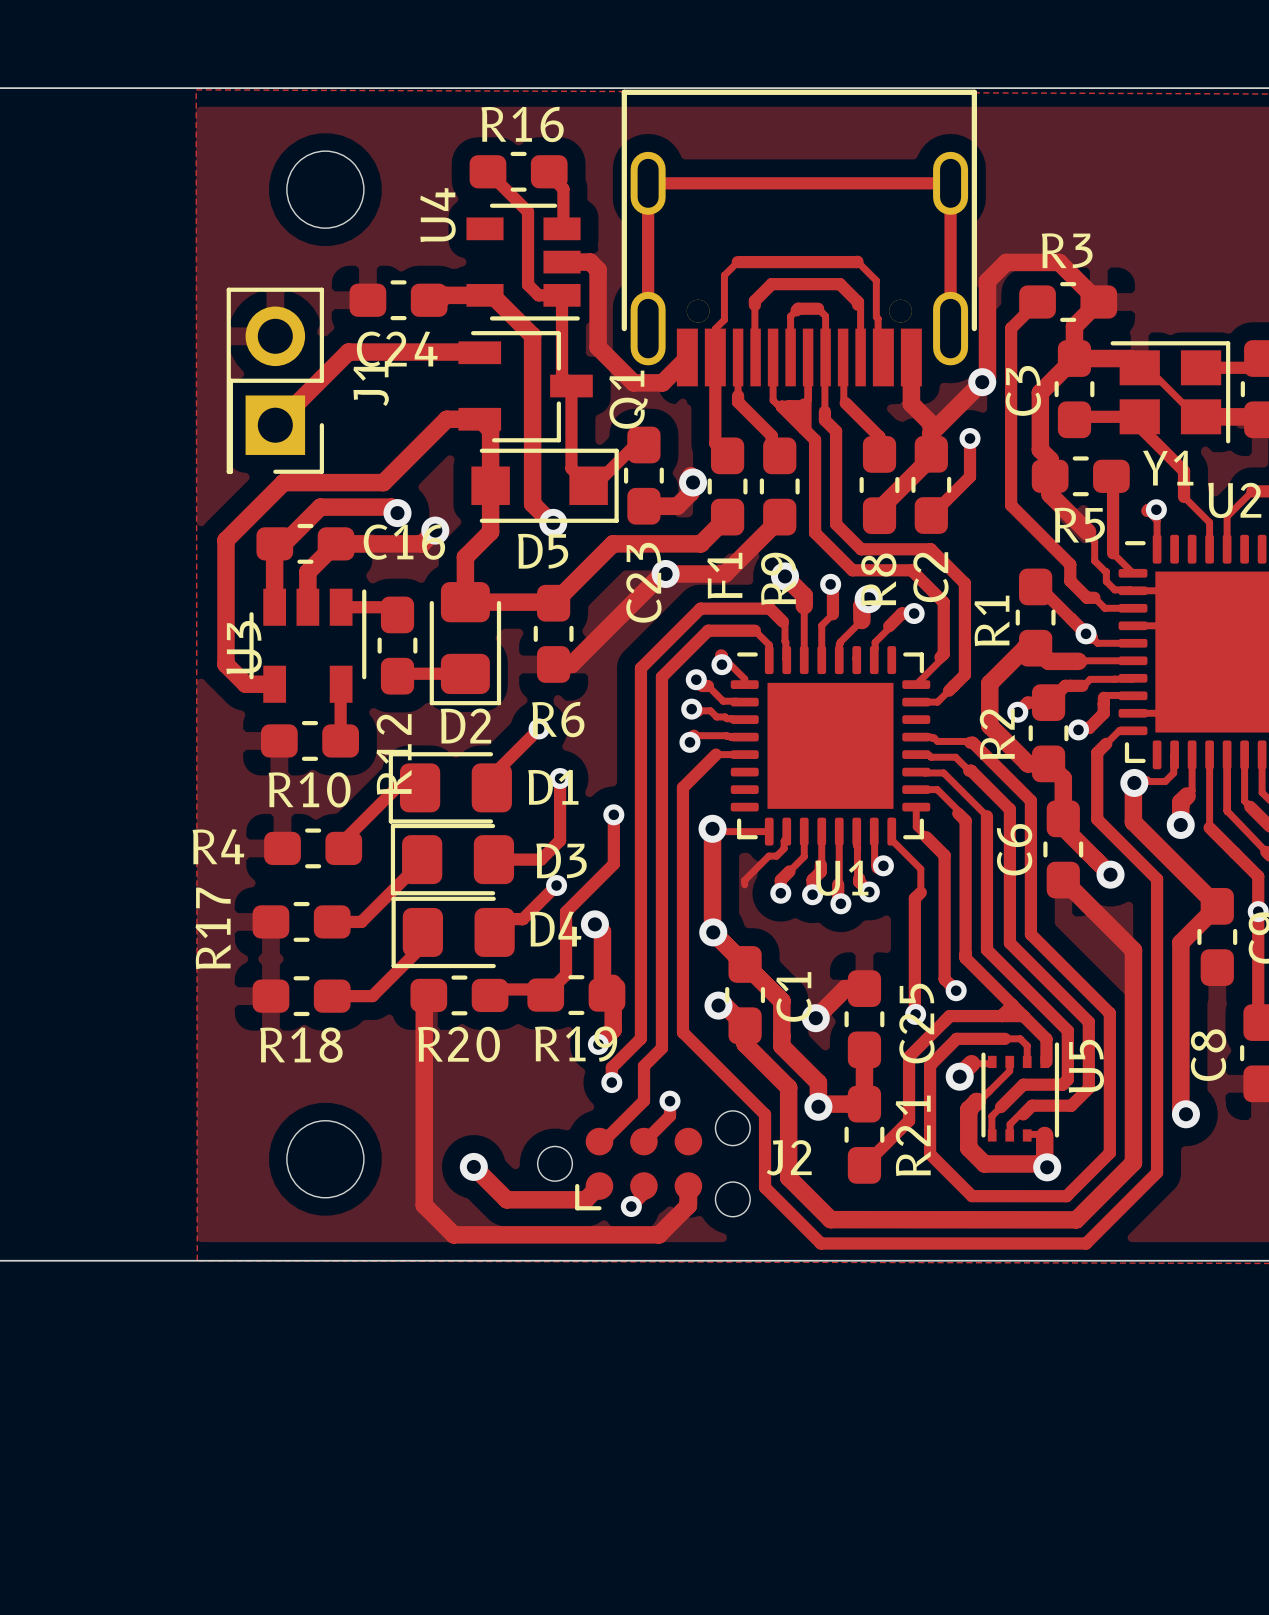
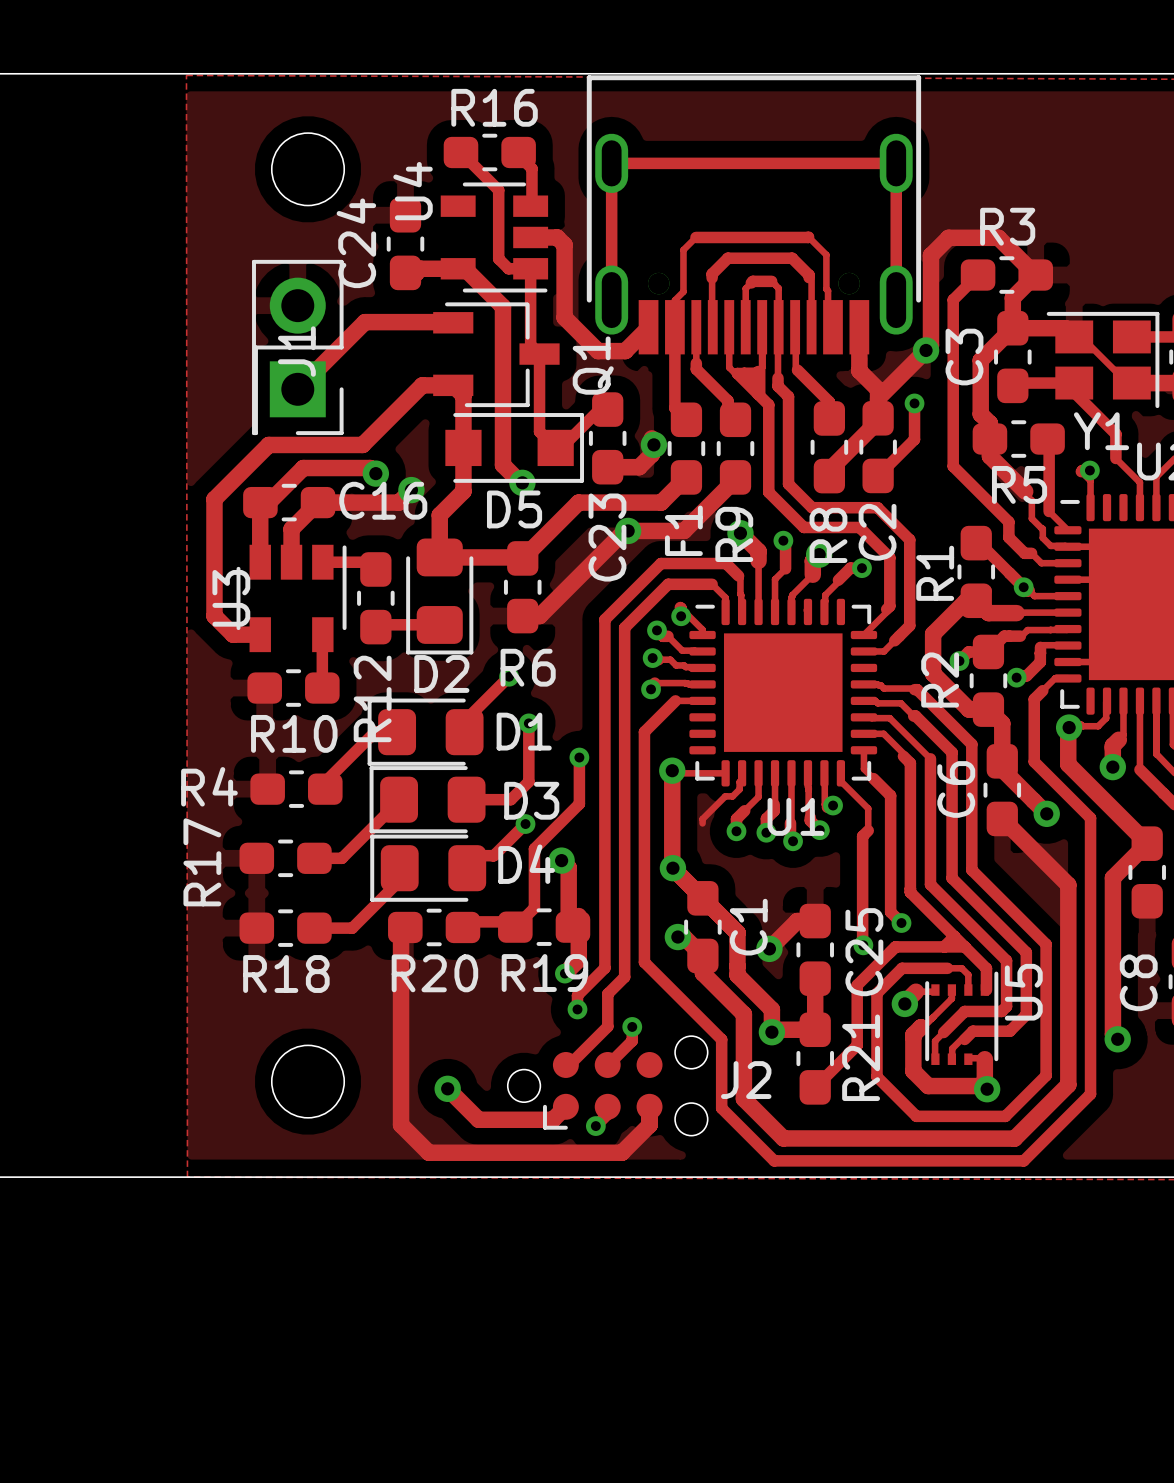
C24 rotation: 0° (398, 300) -> 90° clockwise (405, 244)
track: (385, 352) (348, 352) (275, 425) -> (364, 322) (297, 389)
J1 position: (275, 380) -> (297, 347)
J1 name position: J1 (371, 383) -> J1 (296, 351)

